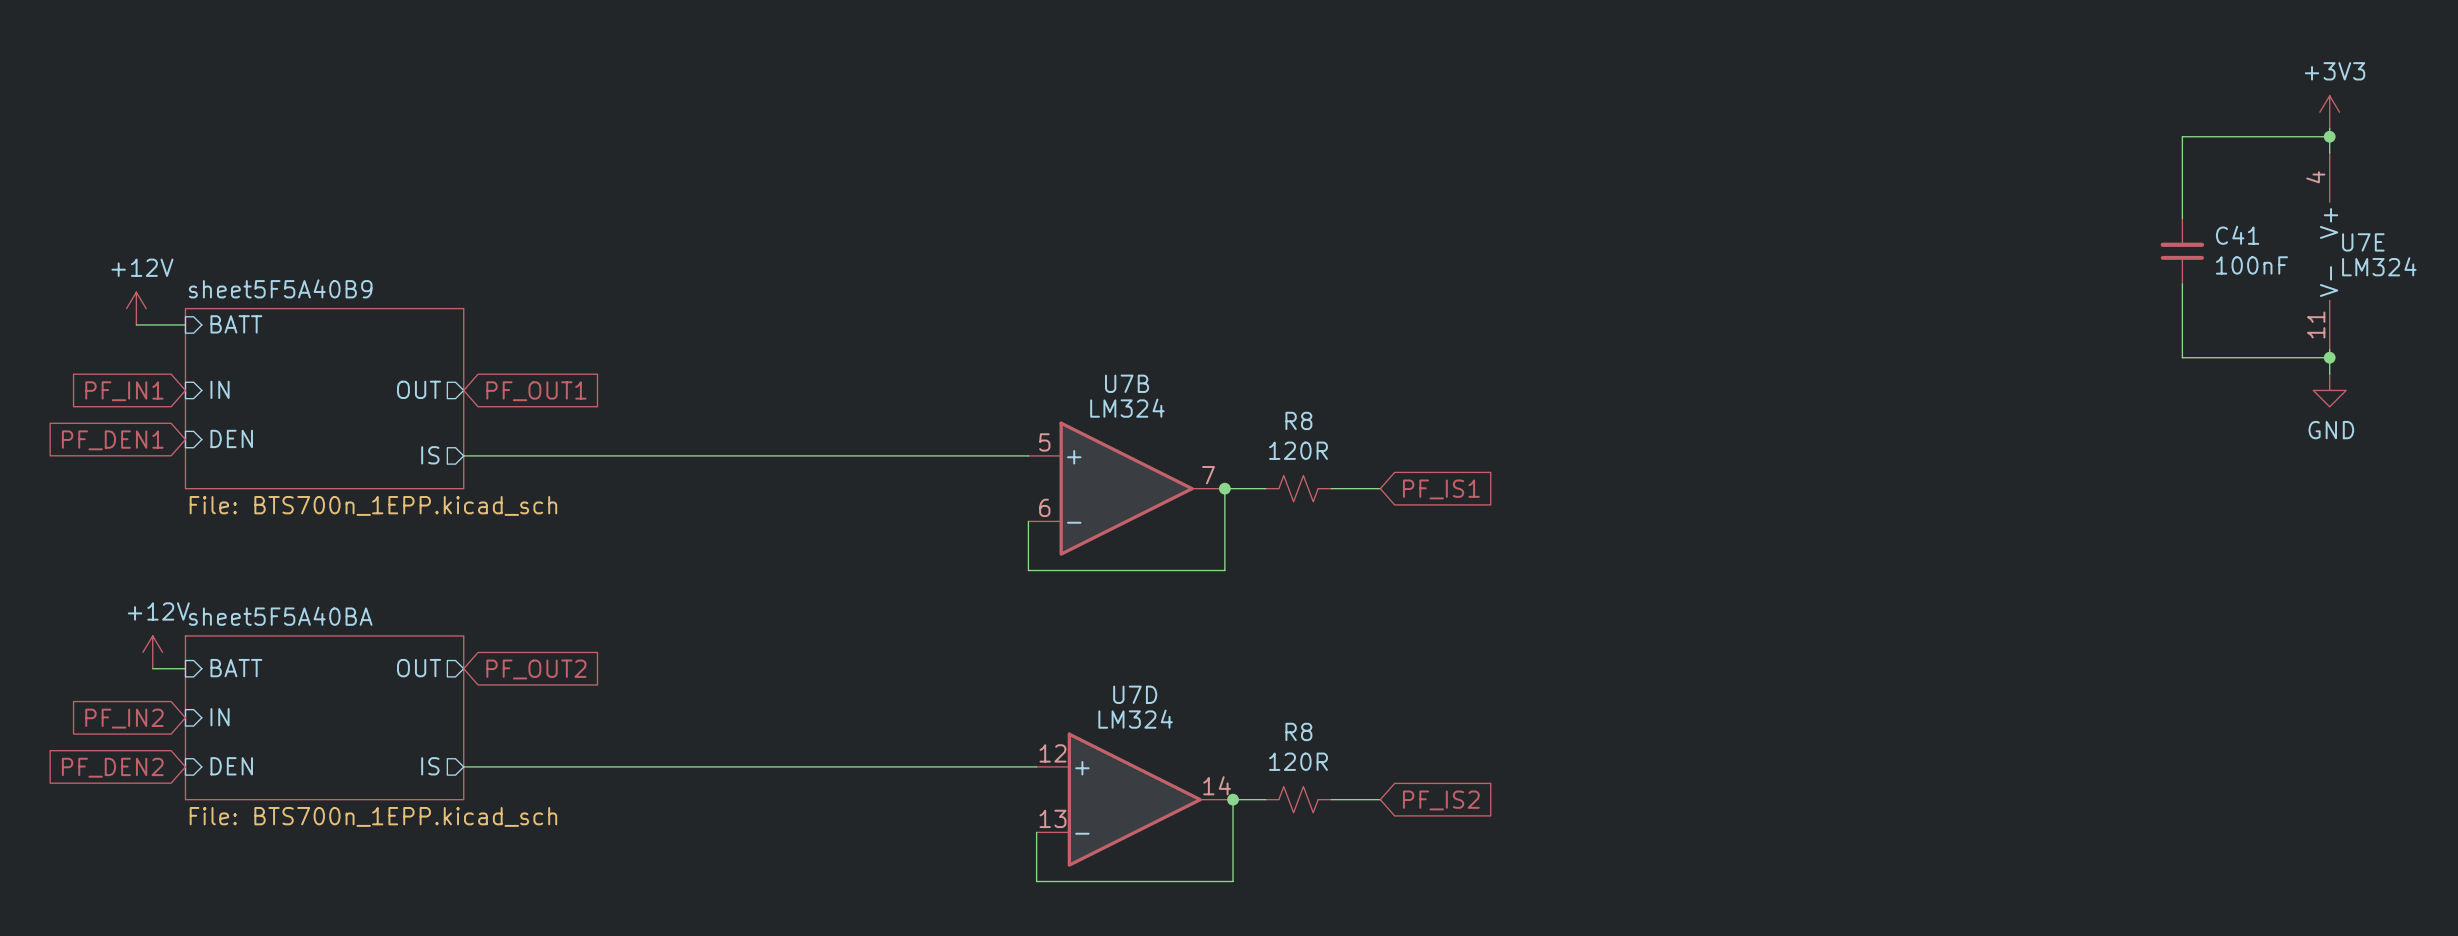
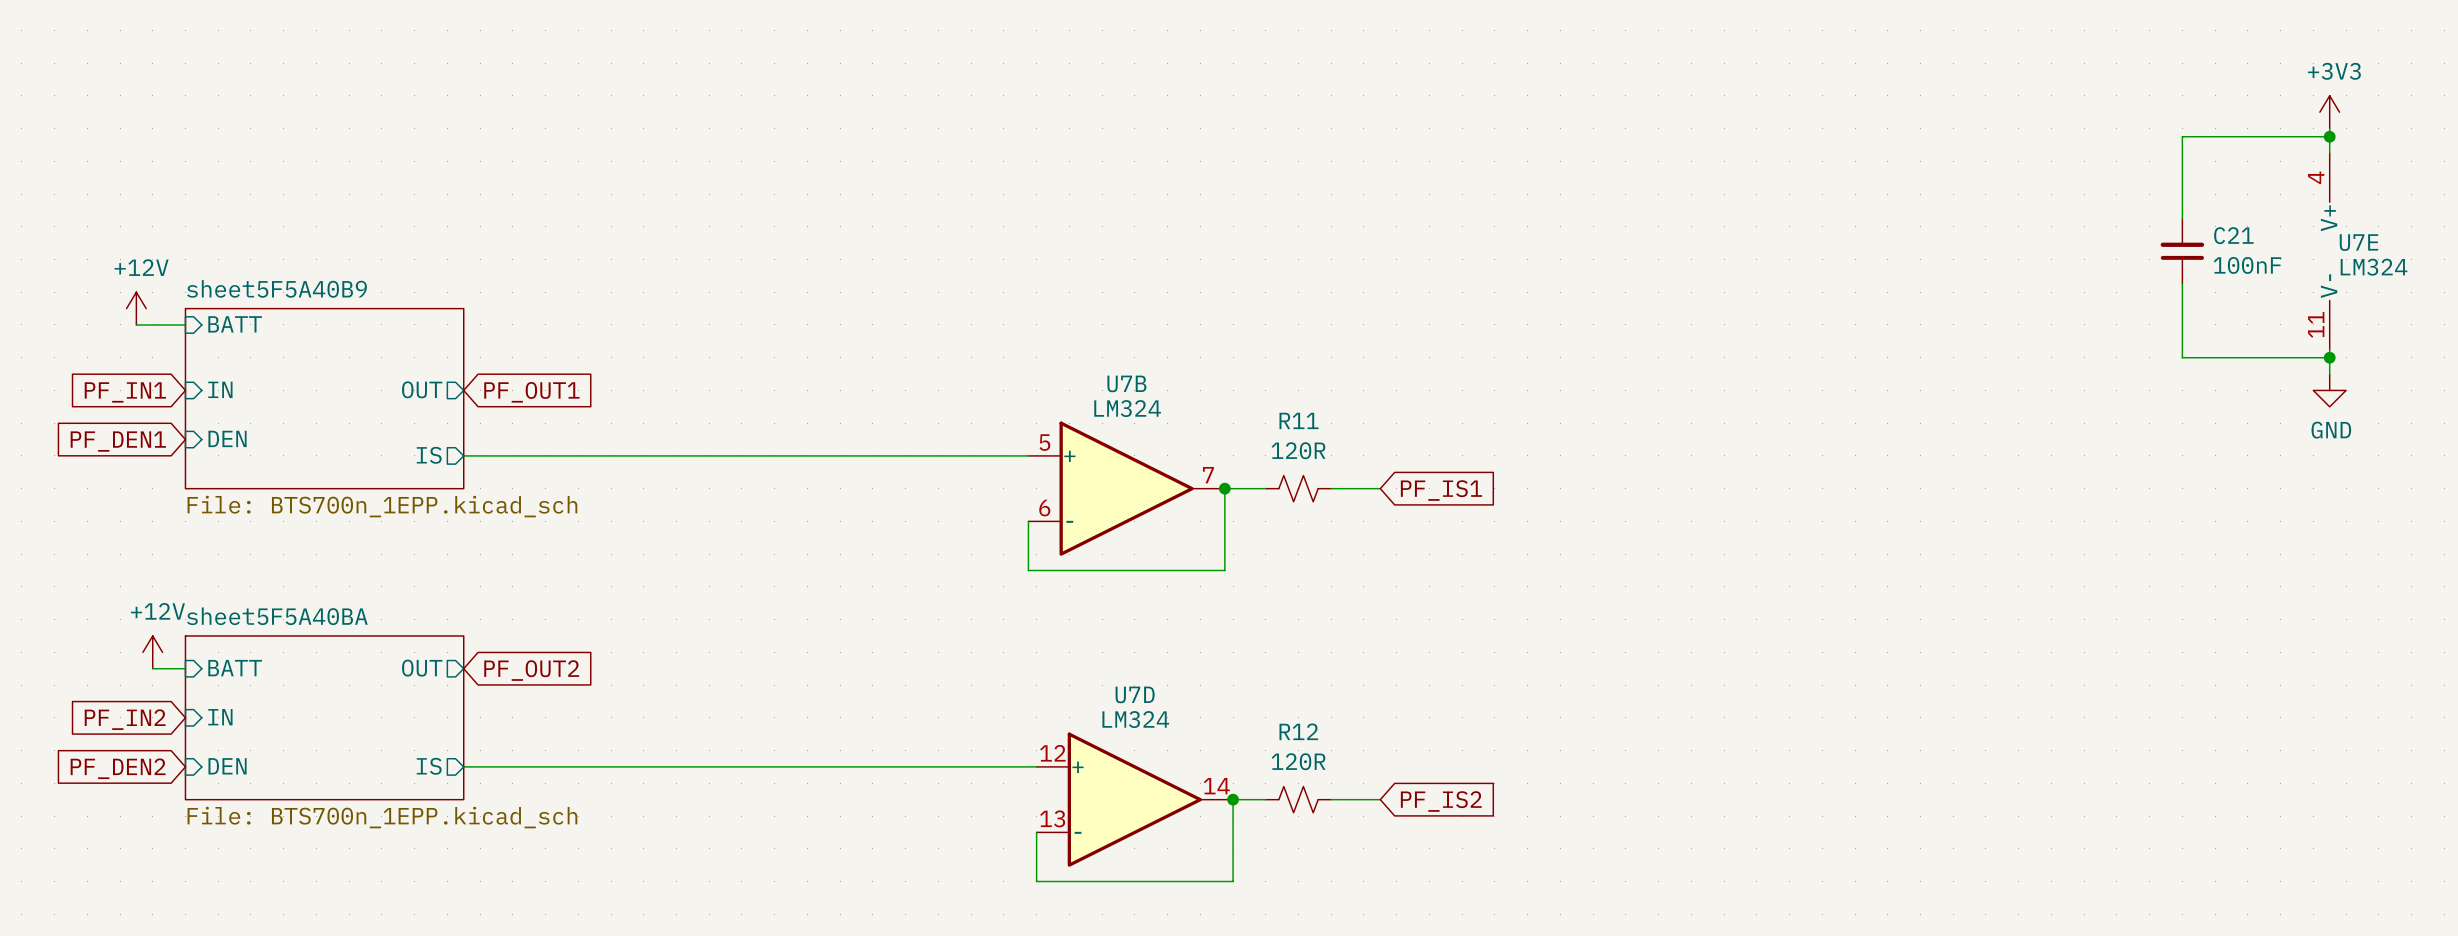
C41 name: C41 (2237, 235) -> C21 (2233, 235)
R8 name: R8 (1298, 420) -> R11 (1299, 420)
R8 name: R8 (1298, 731) -> R12 (1298, 731)

